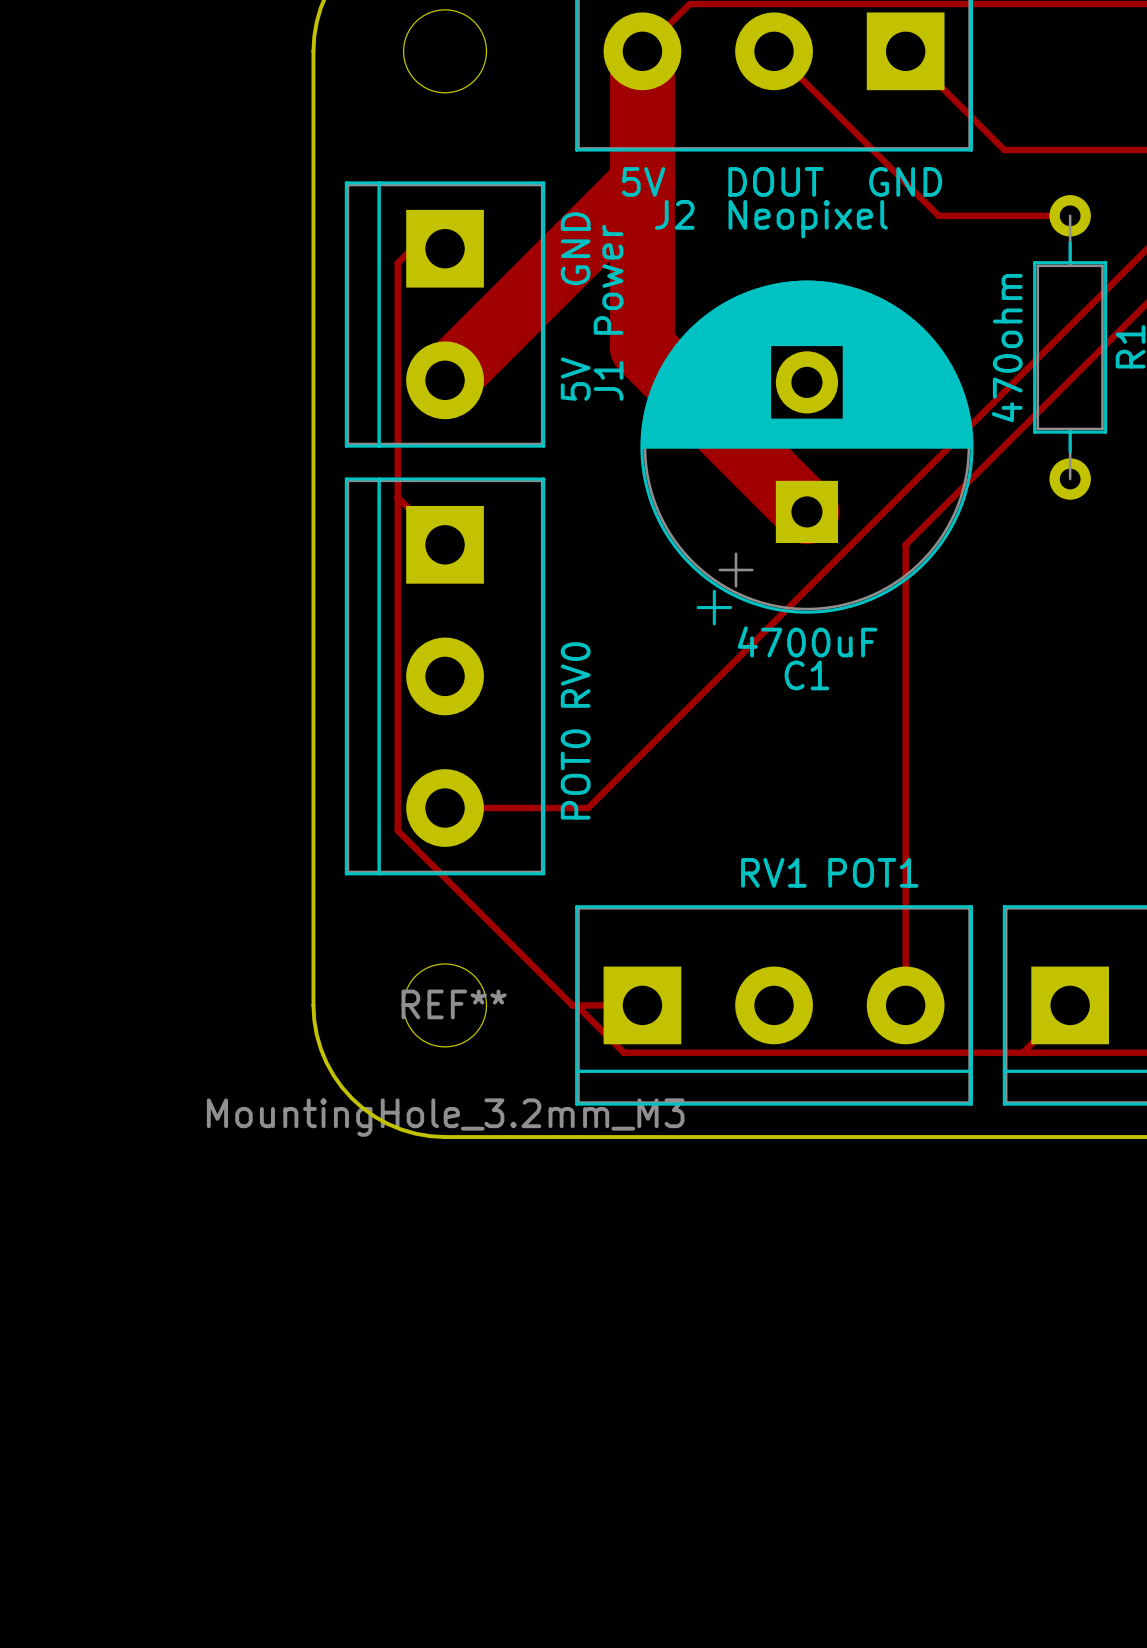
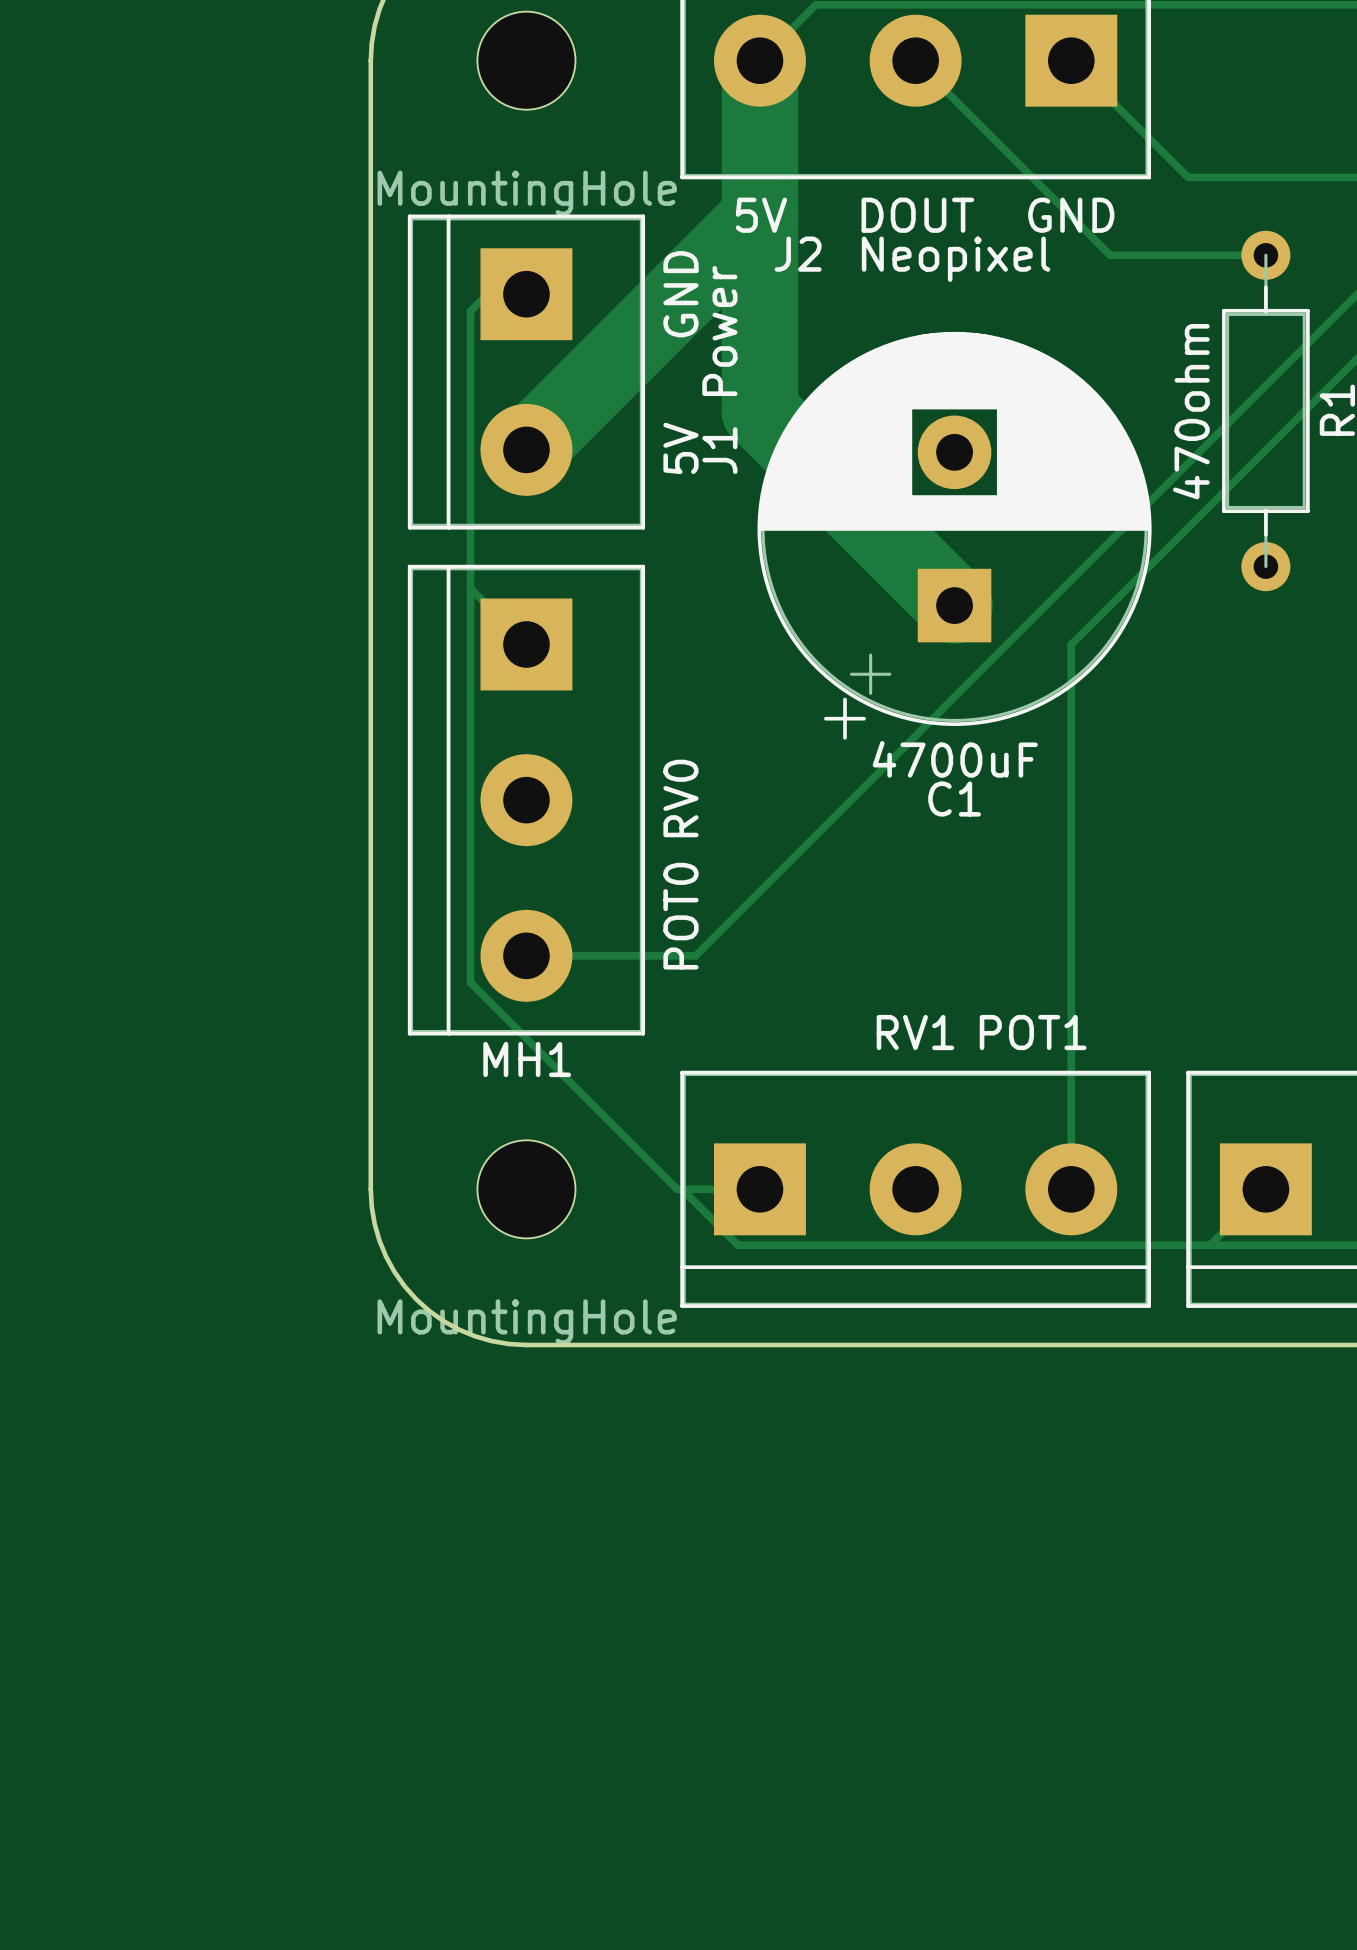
part value: none -> MountingHole (527, 193)
REF** name: REF** (454, 1004) -> MH1 (527, 1059)
REF** value: MountingHole_3.2mm_M3 (445, 1117) -> MountingHole (527, 1322)

